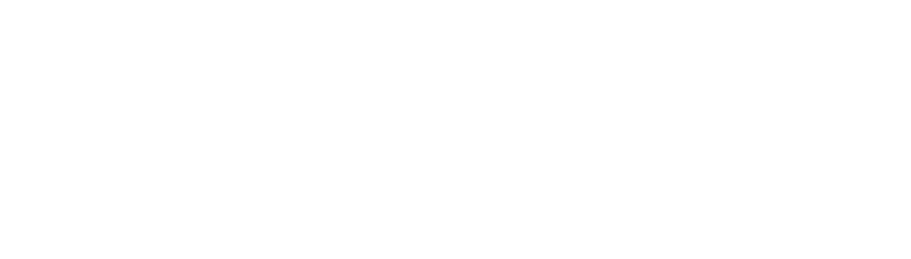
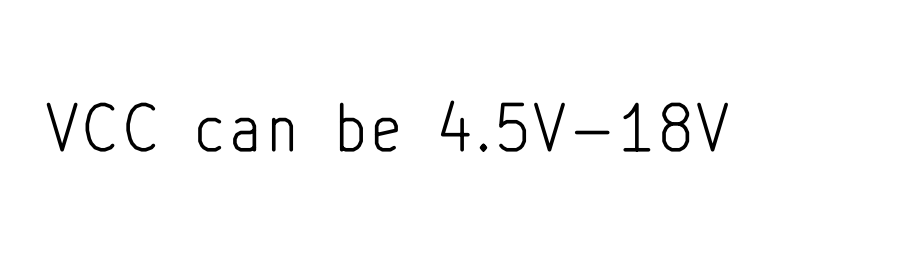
text: none -> VCC can be 4.5V-18V (387, 126)

